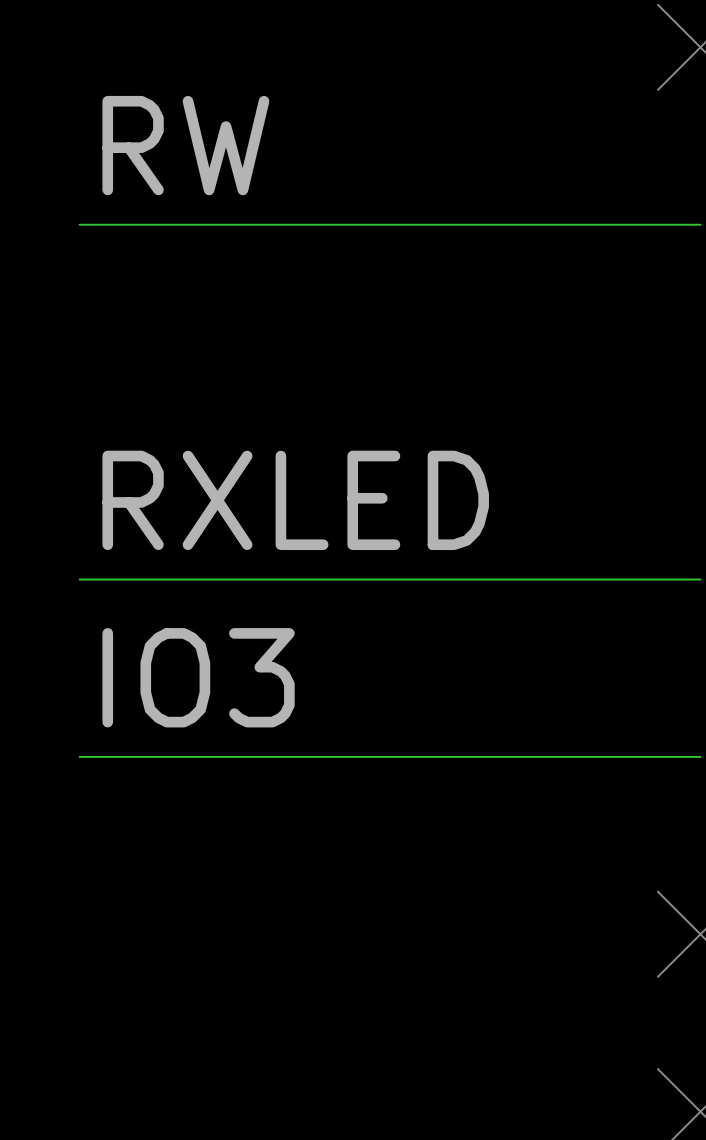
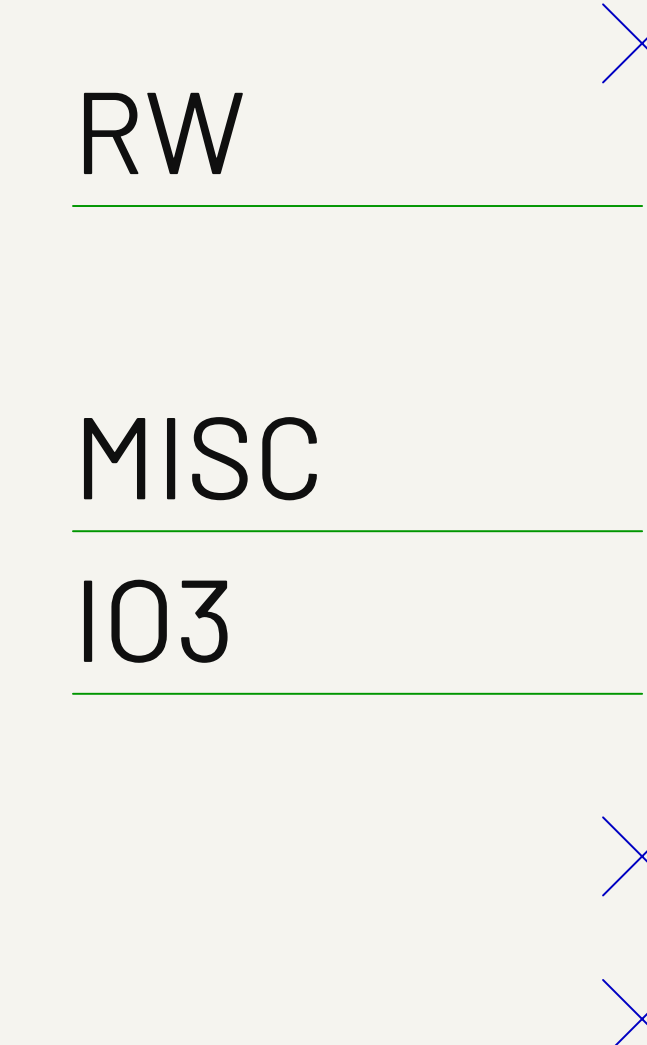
label: RXLED (295, 500) -> MISC (200, 458)

